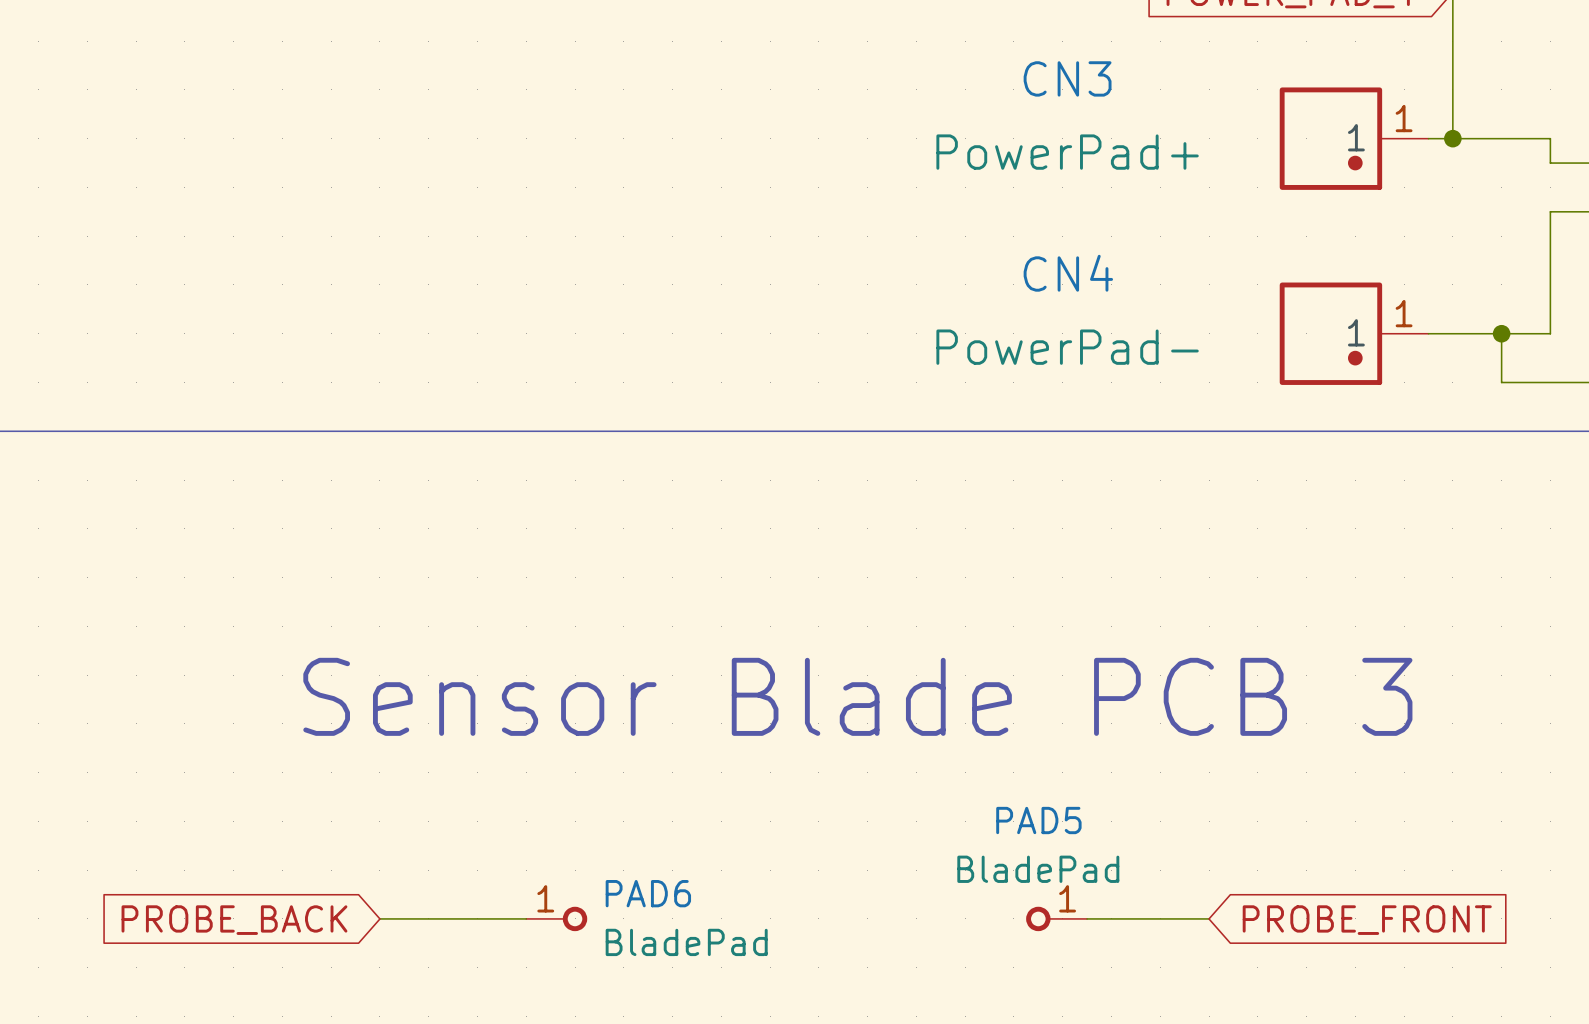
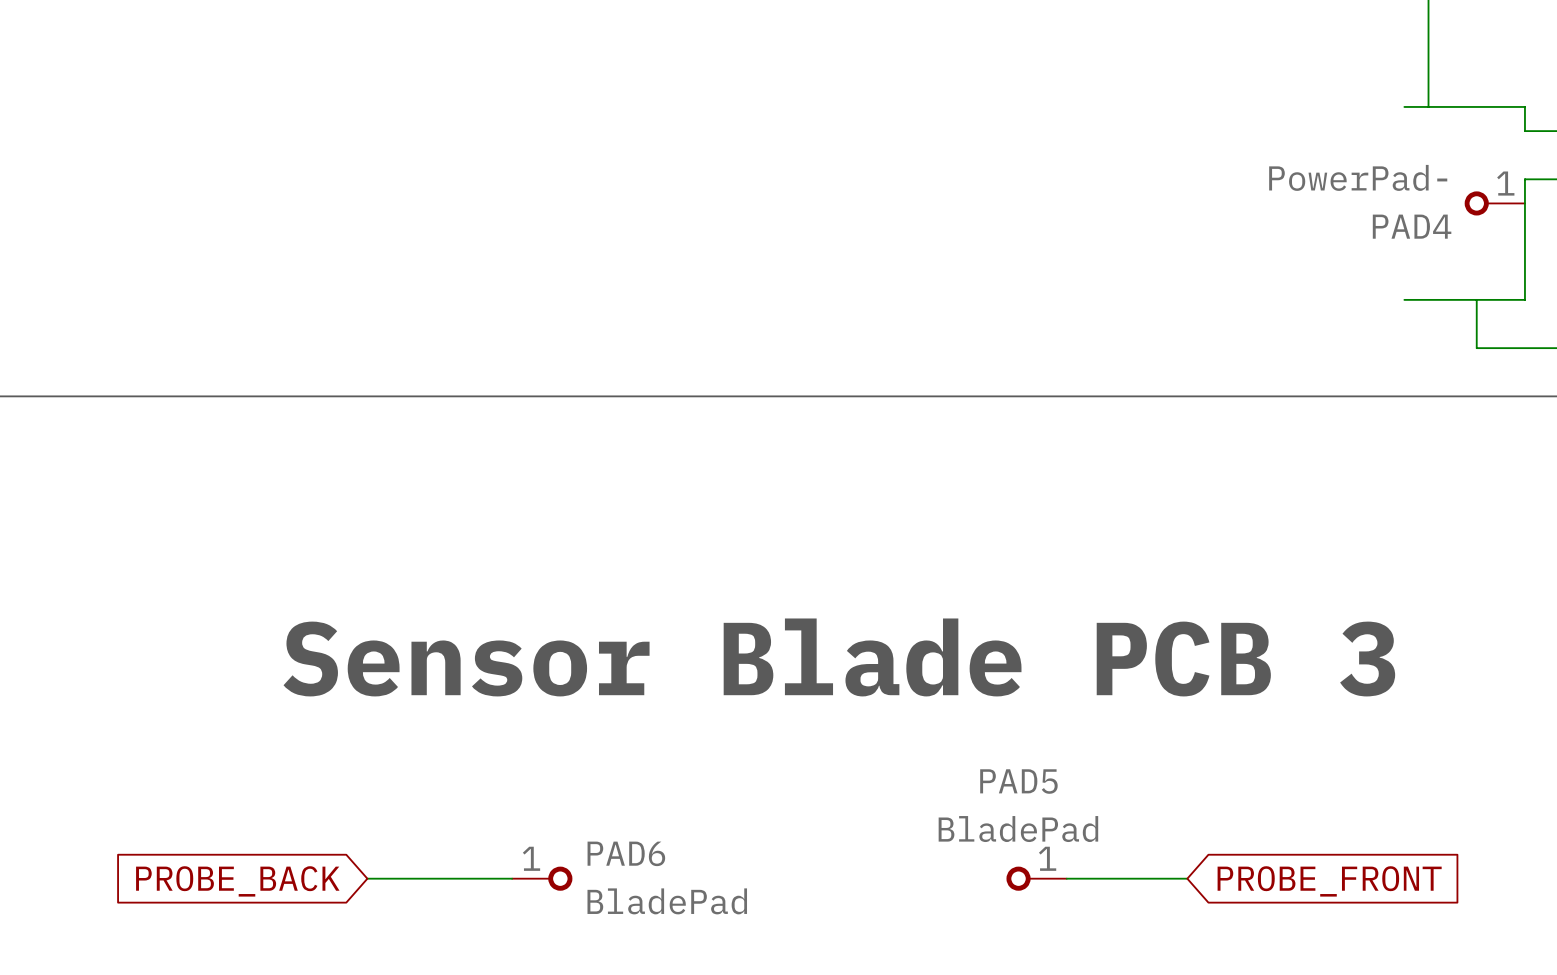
CN3: PowerPad+ (1354, 138) -> none
junction: (1452, 138) -> none
PAD4: none -> PowerPad- (1494, 203)
CN4: PowerPad- (1354, 333) -> none
junction: (1501, 333) -> none

